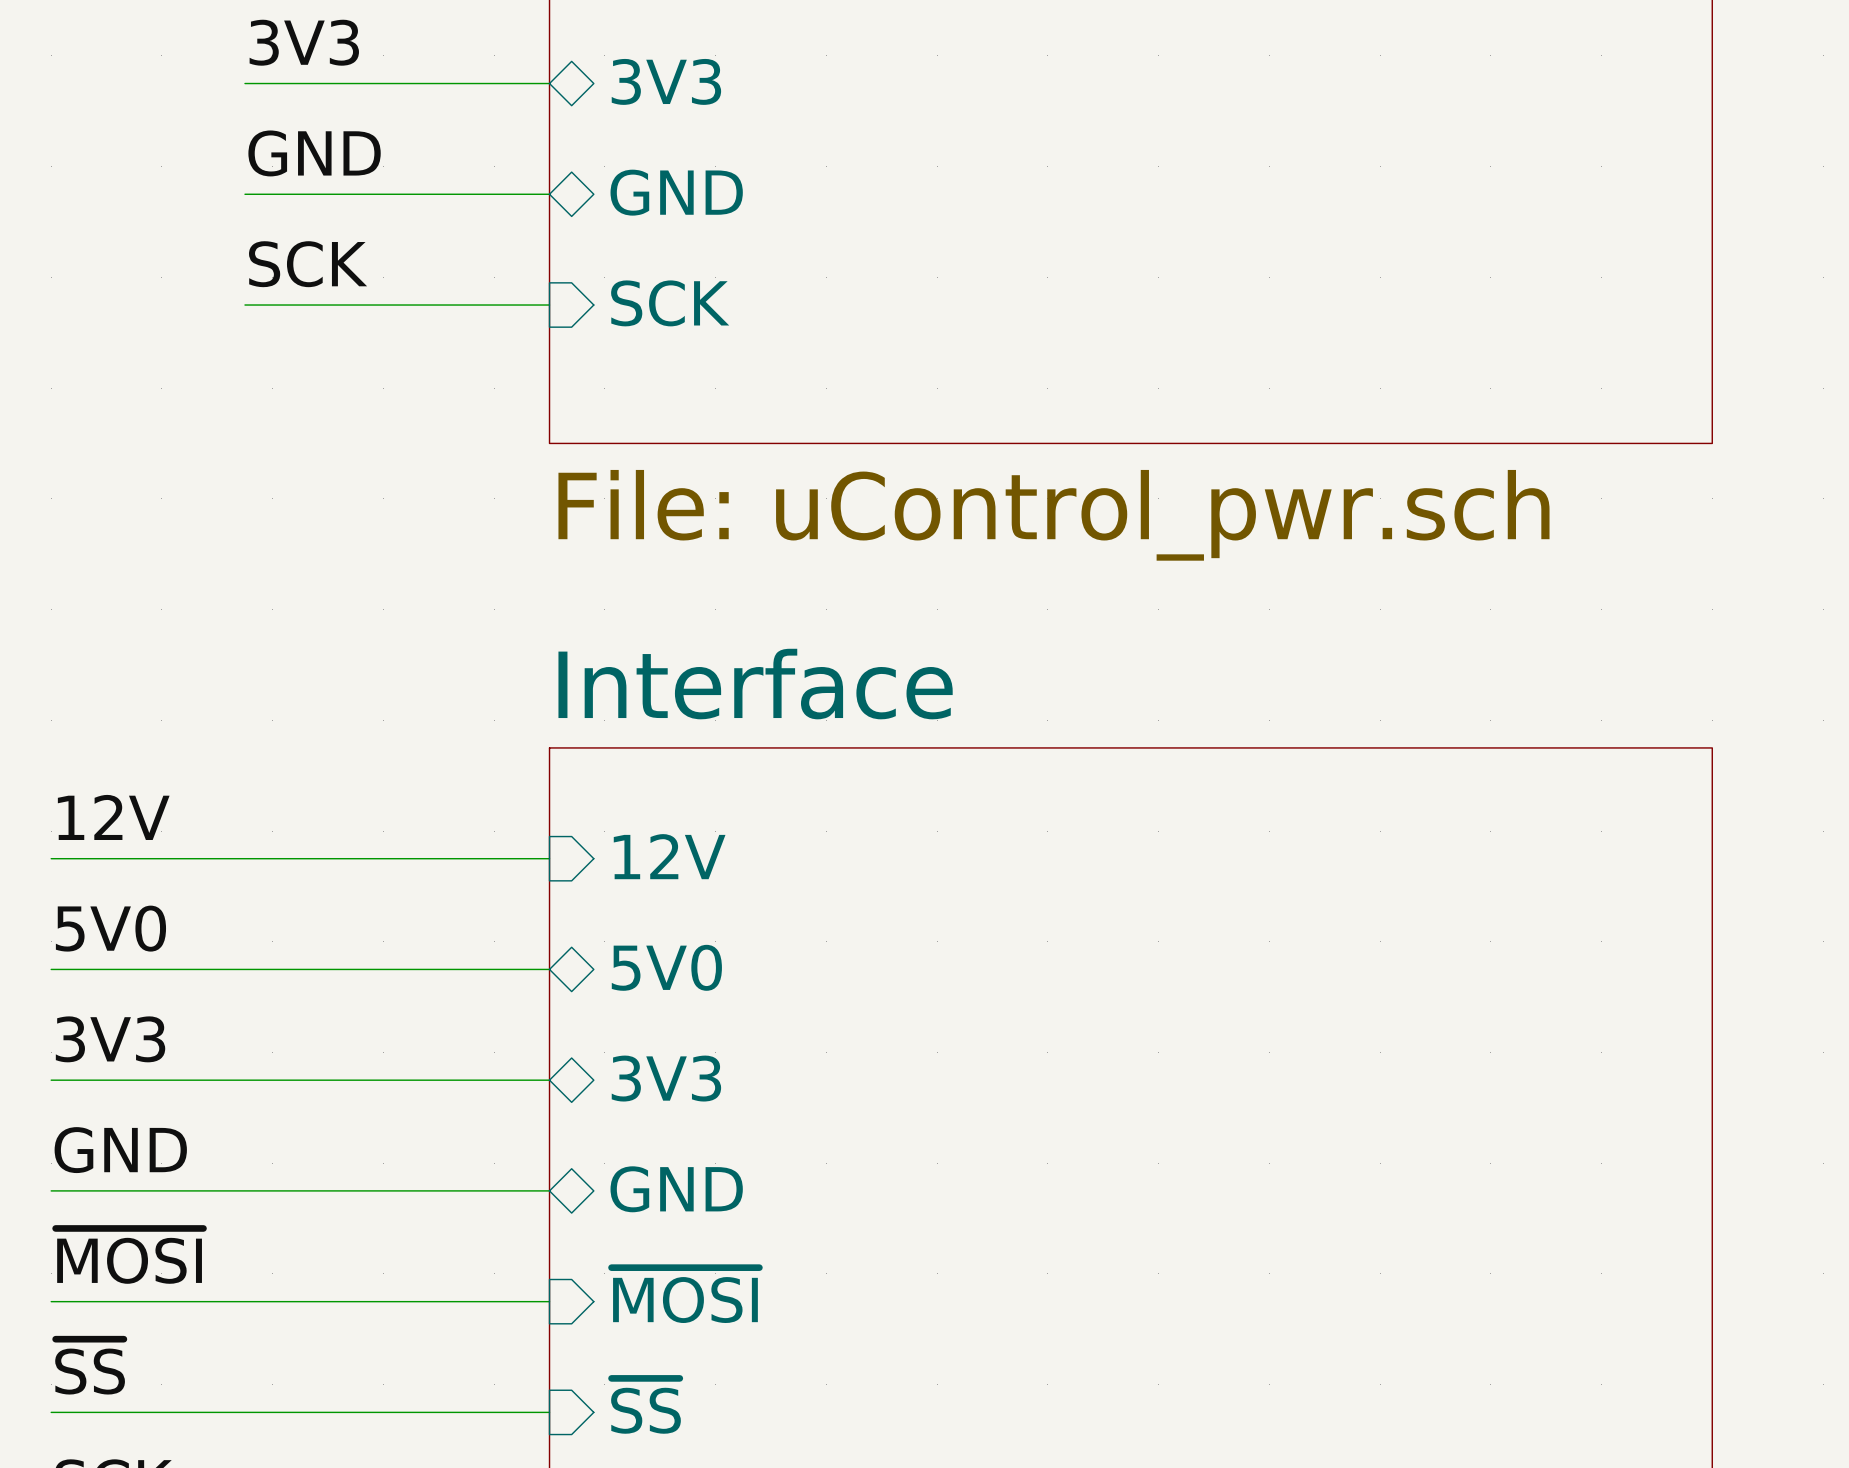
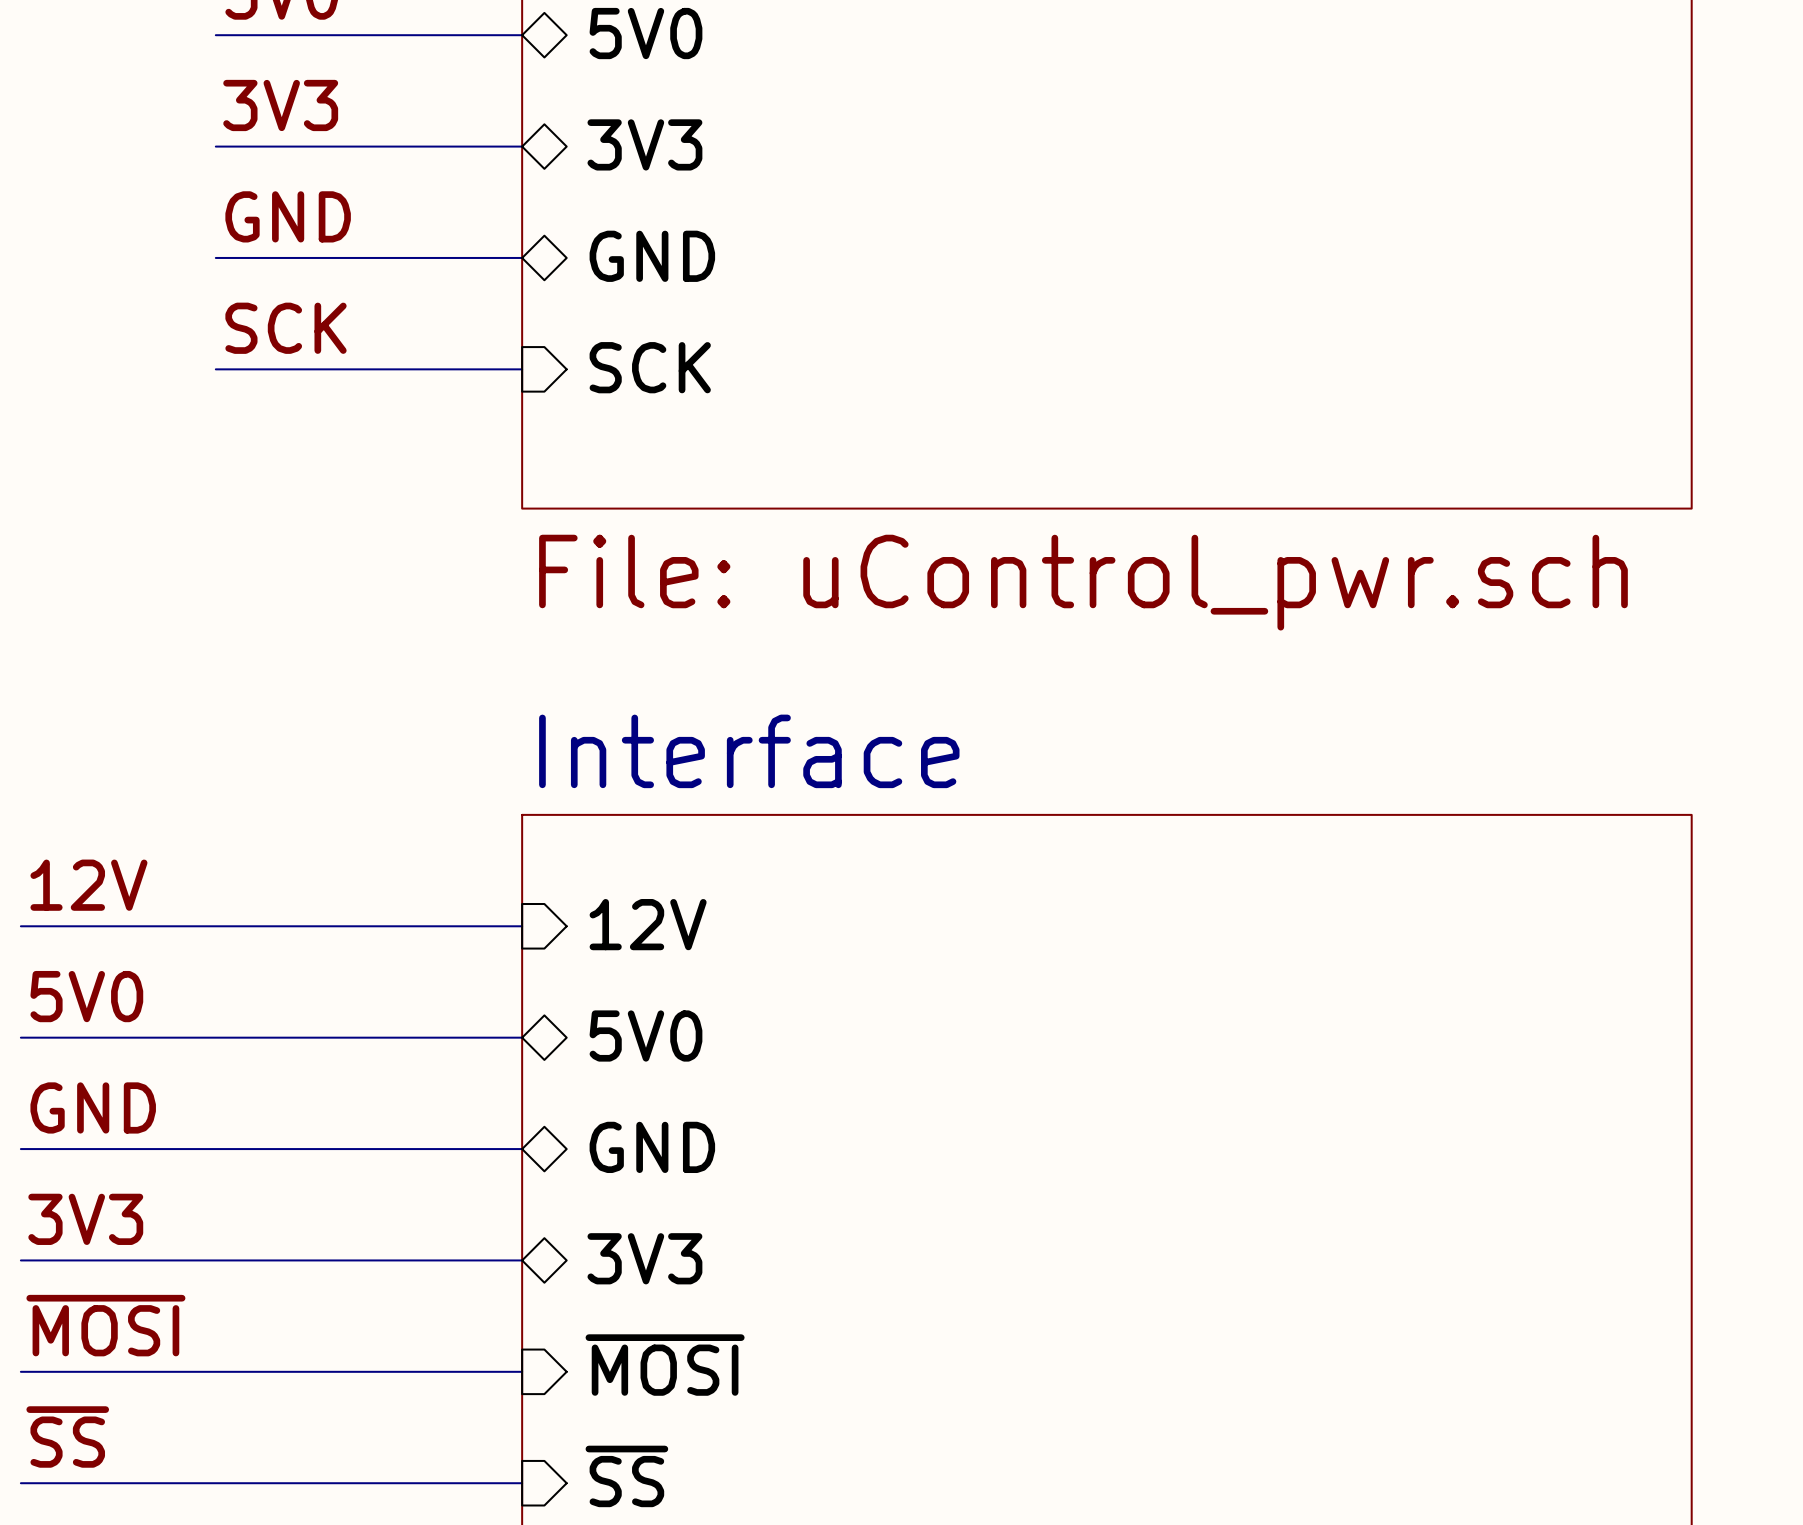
label: 3V3 (110, 1039) -> GND (93, 1107)
sheet pin: 3V3 (666, 1078) -> GND (652, 1147)
label: GND (120, 1150) -> 3V3 (85, 1219)
sheet pin: GND (676, 1189) -> 3V3 (644, 1258)

